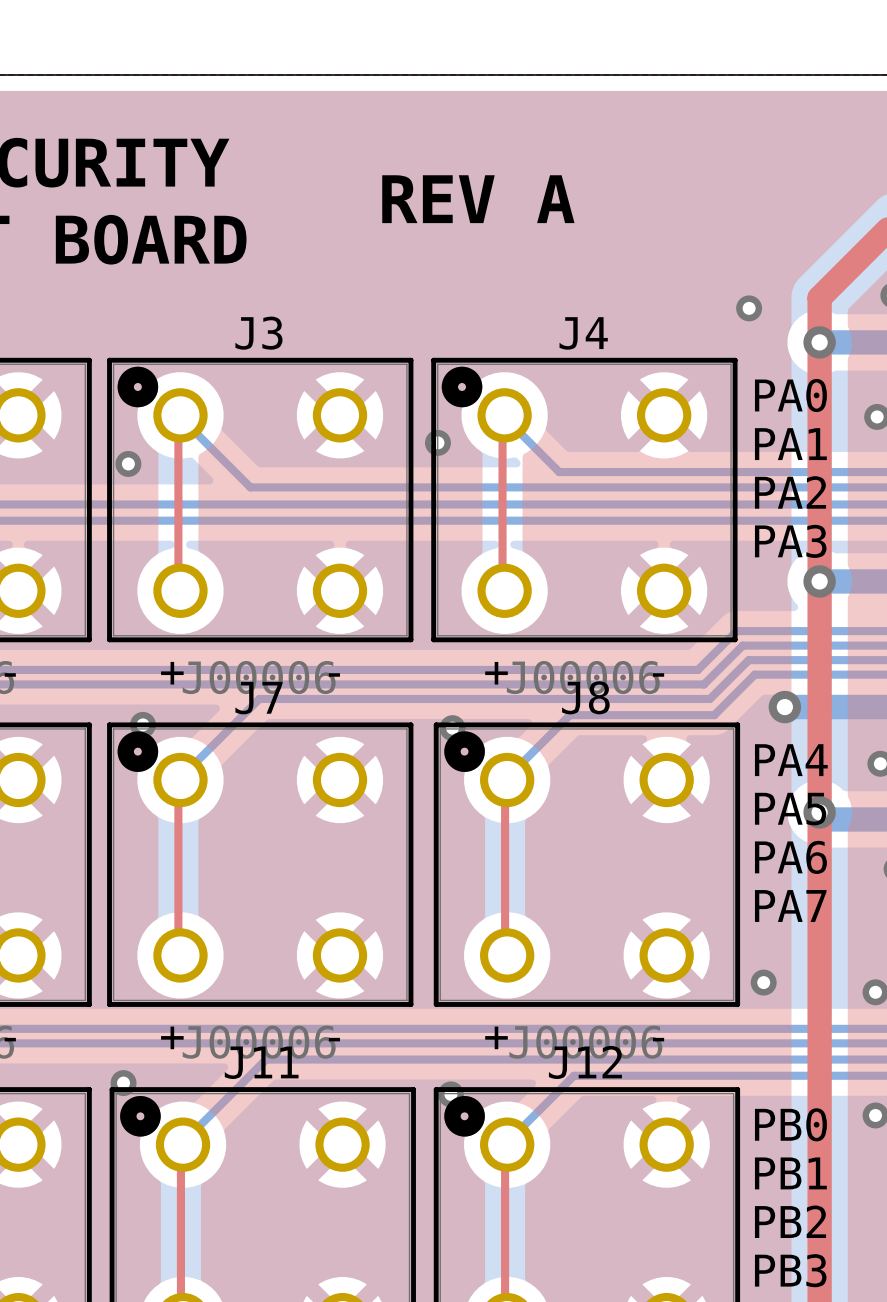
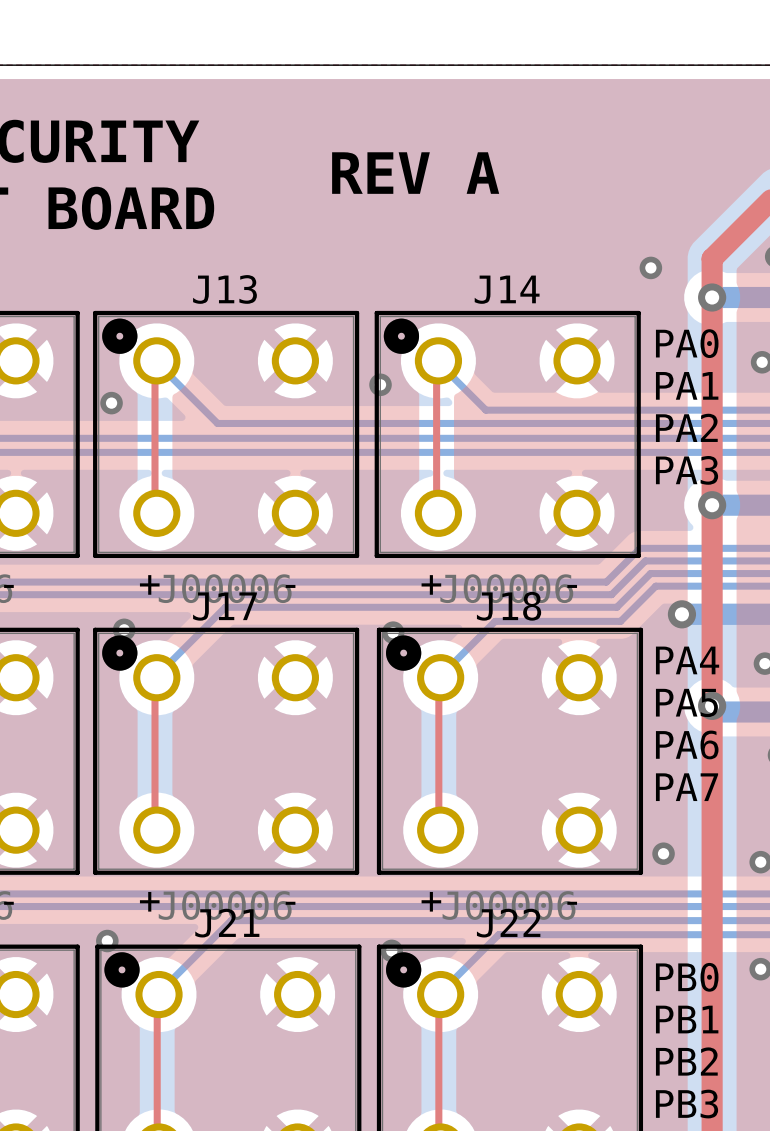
J3 name: J3 (258, 333) -> J13 (224, 289)
J4 name: J4 (583, 333) -> J14 (507, 289)
J8 name: J8 (585, 697) -> J18 (509, 606)
J7 name: J7 (258, 698) -> J17 (224, 606)
J11 name: J11 (261, 1062) -> J21 (227, 923)
J12 name: J12 (585, 1062) -> J22 (508, 923)

